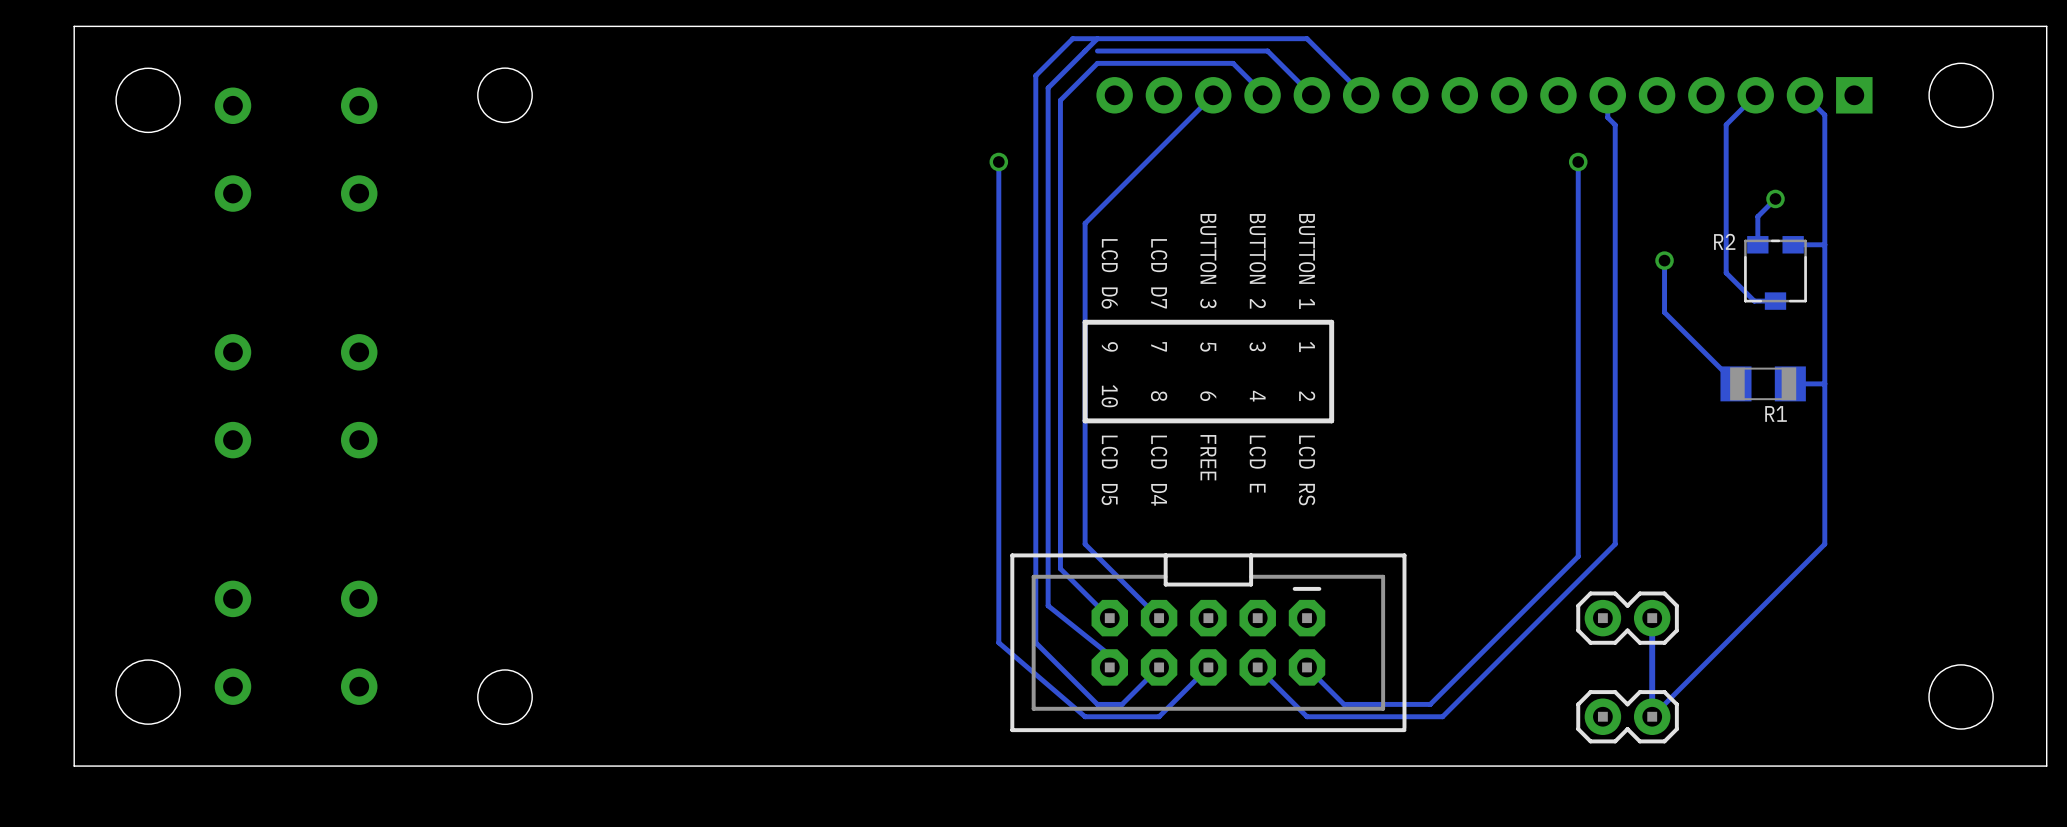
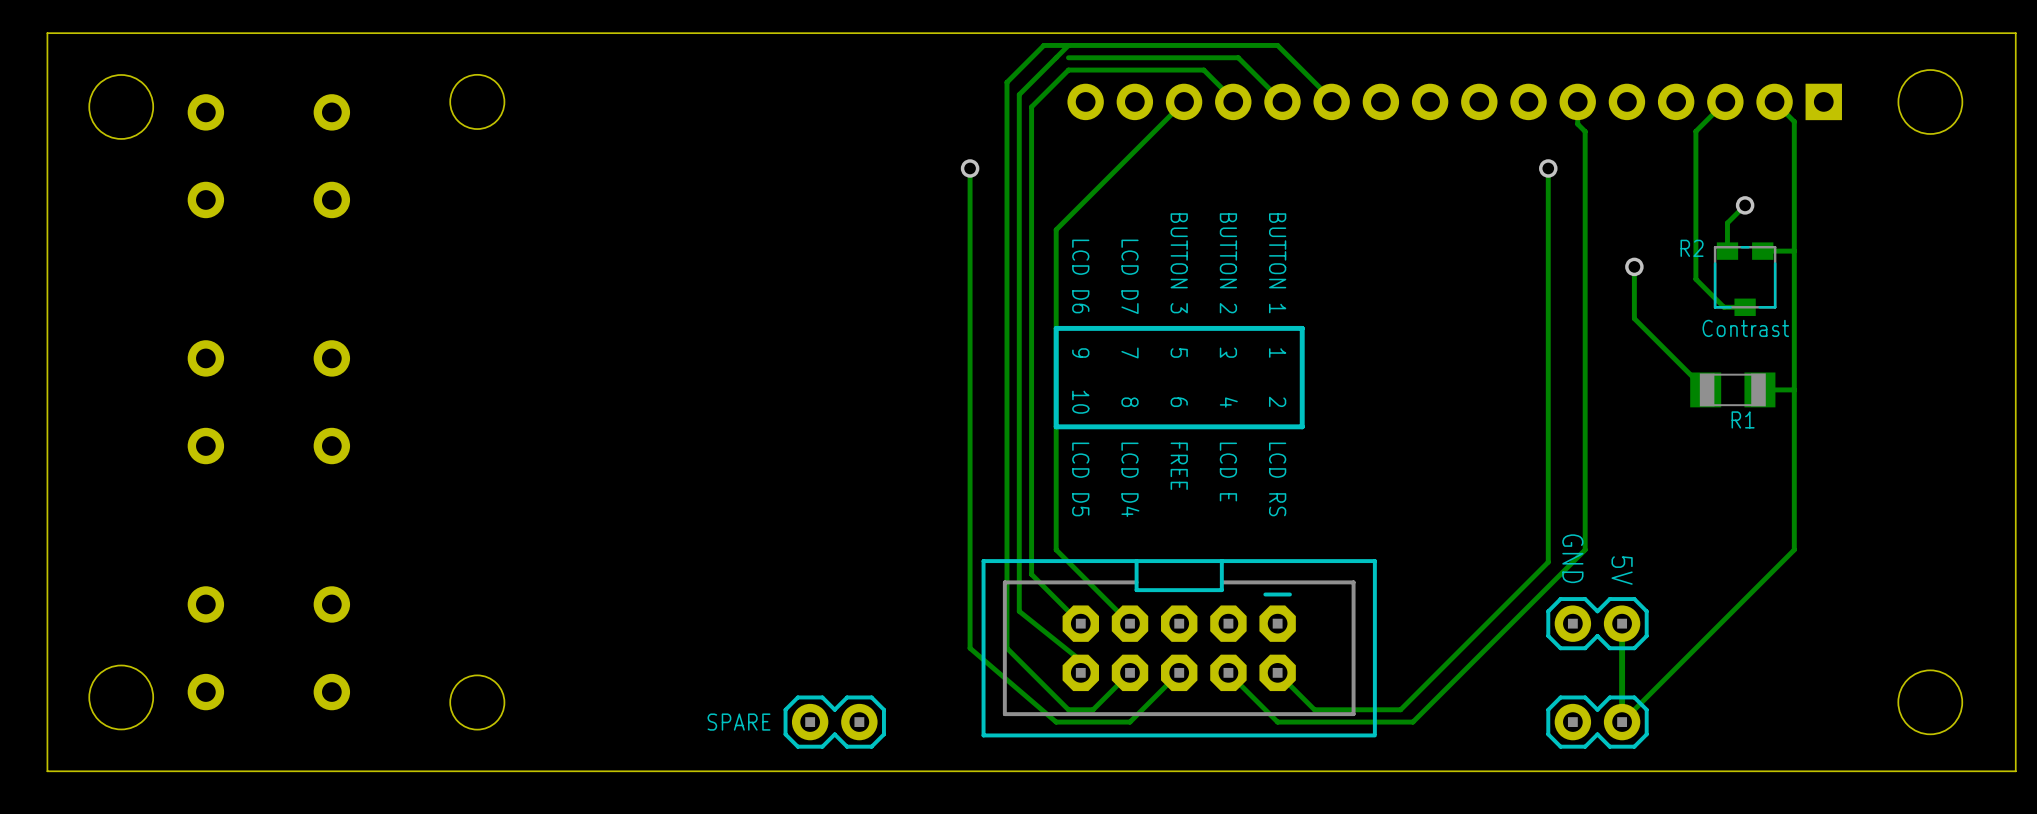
text: none -> Contrast (1745, 328)
text: none -> GND (1572, 558)
text: none -> 5V (1622, 570)
text: none -> SPARE (739, 722)
part: none -> (834, 722)

